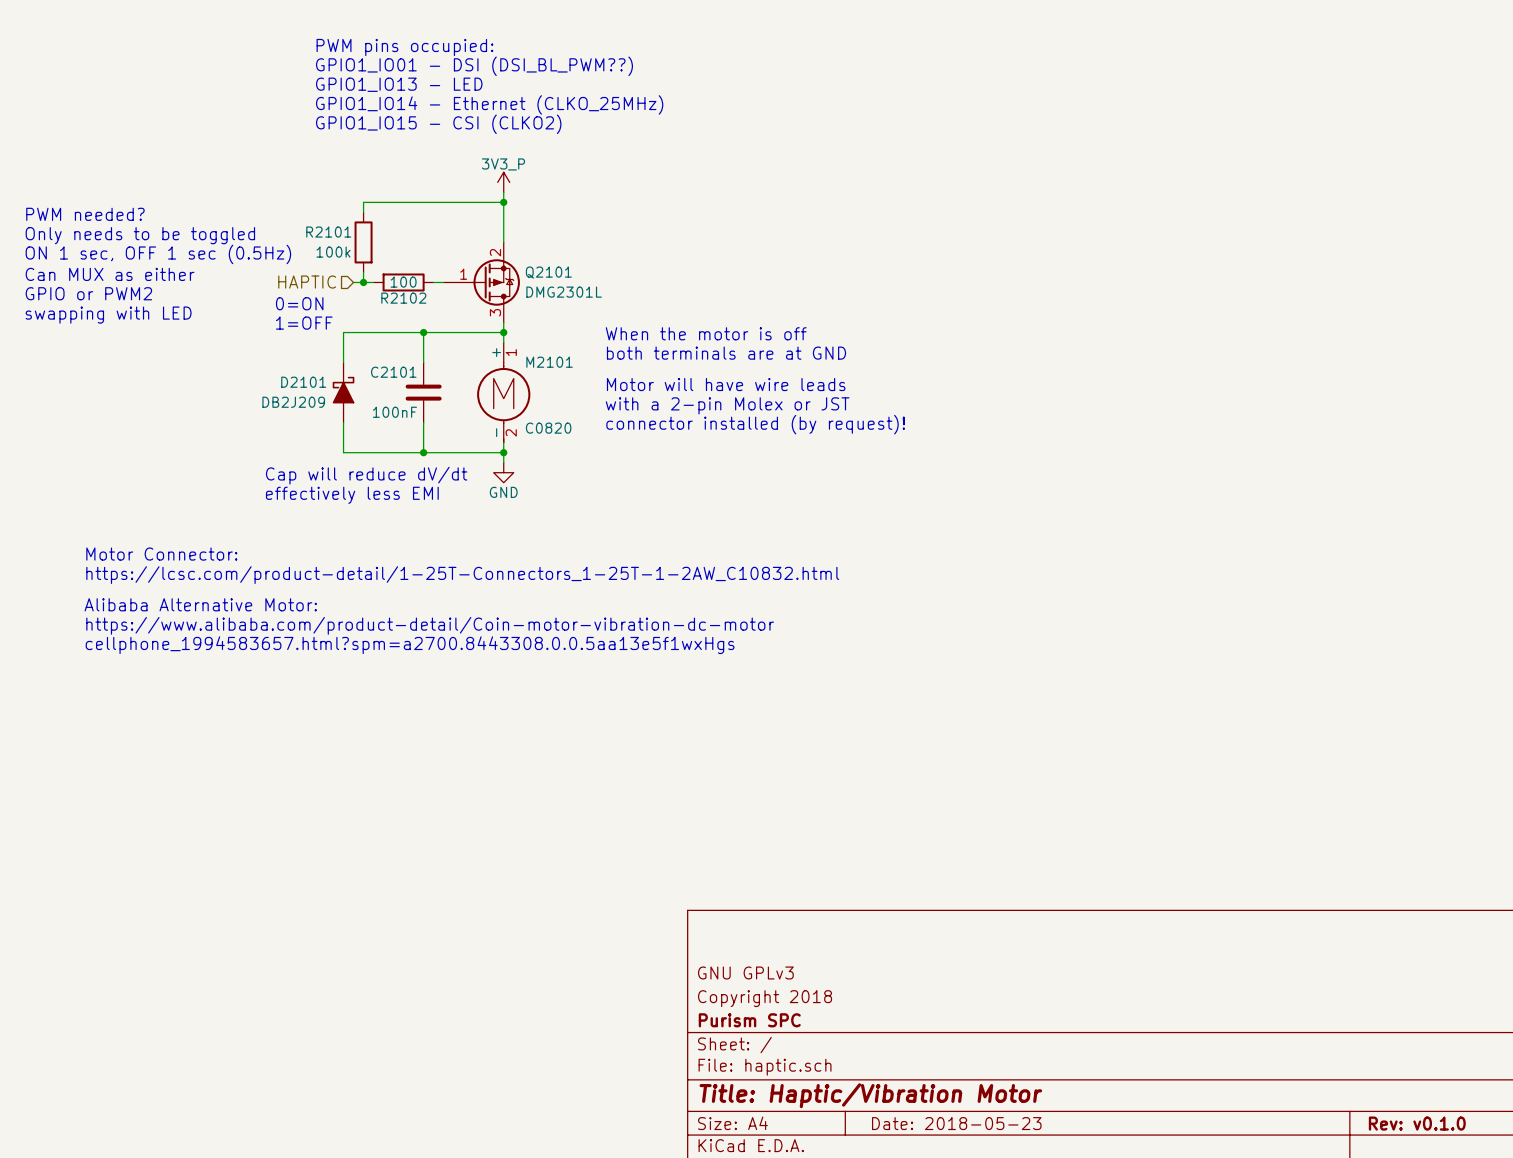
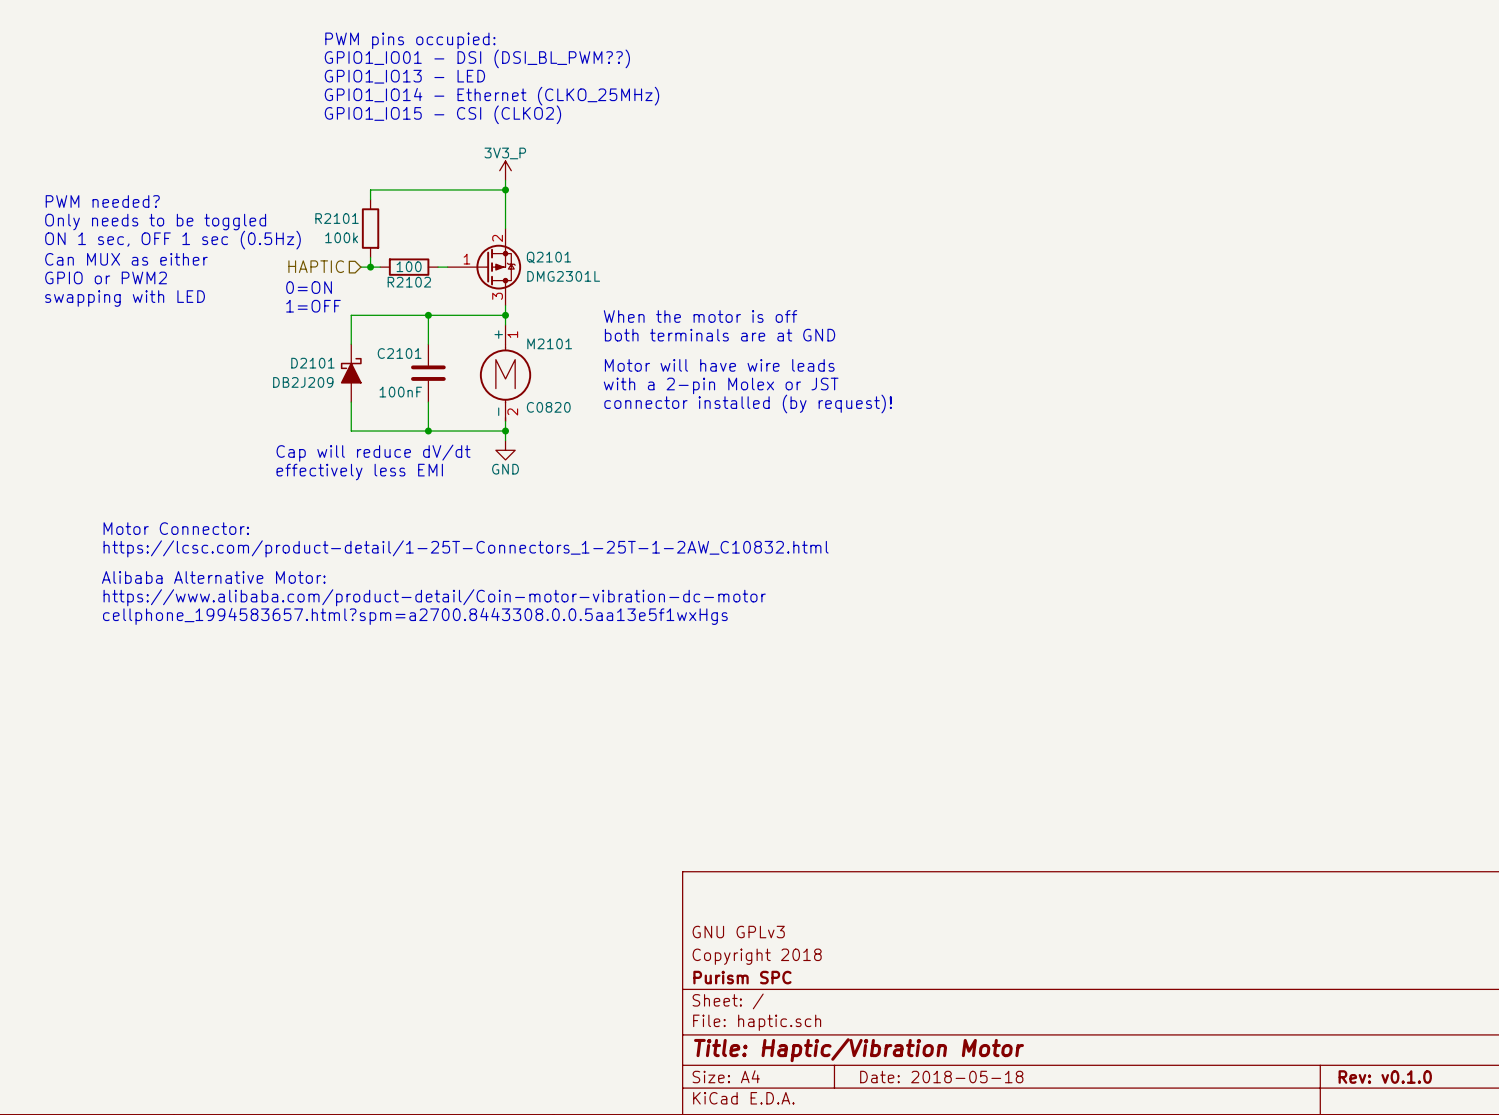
title block: Date: 2018-05-23 (956, 1123) -> Date: 2018-05-18 (941, 1077)

